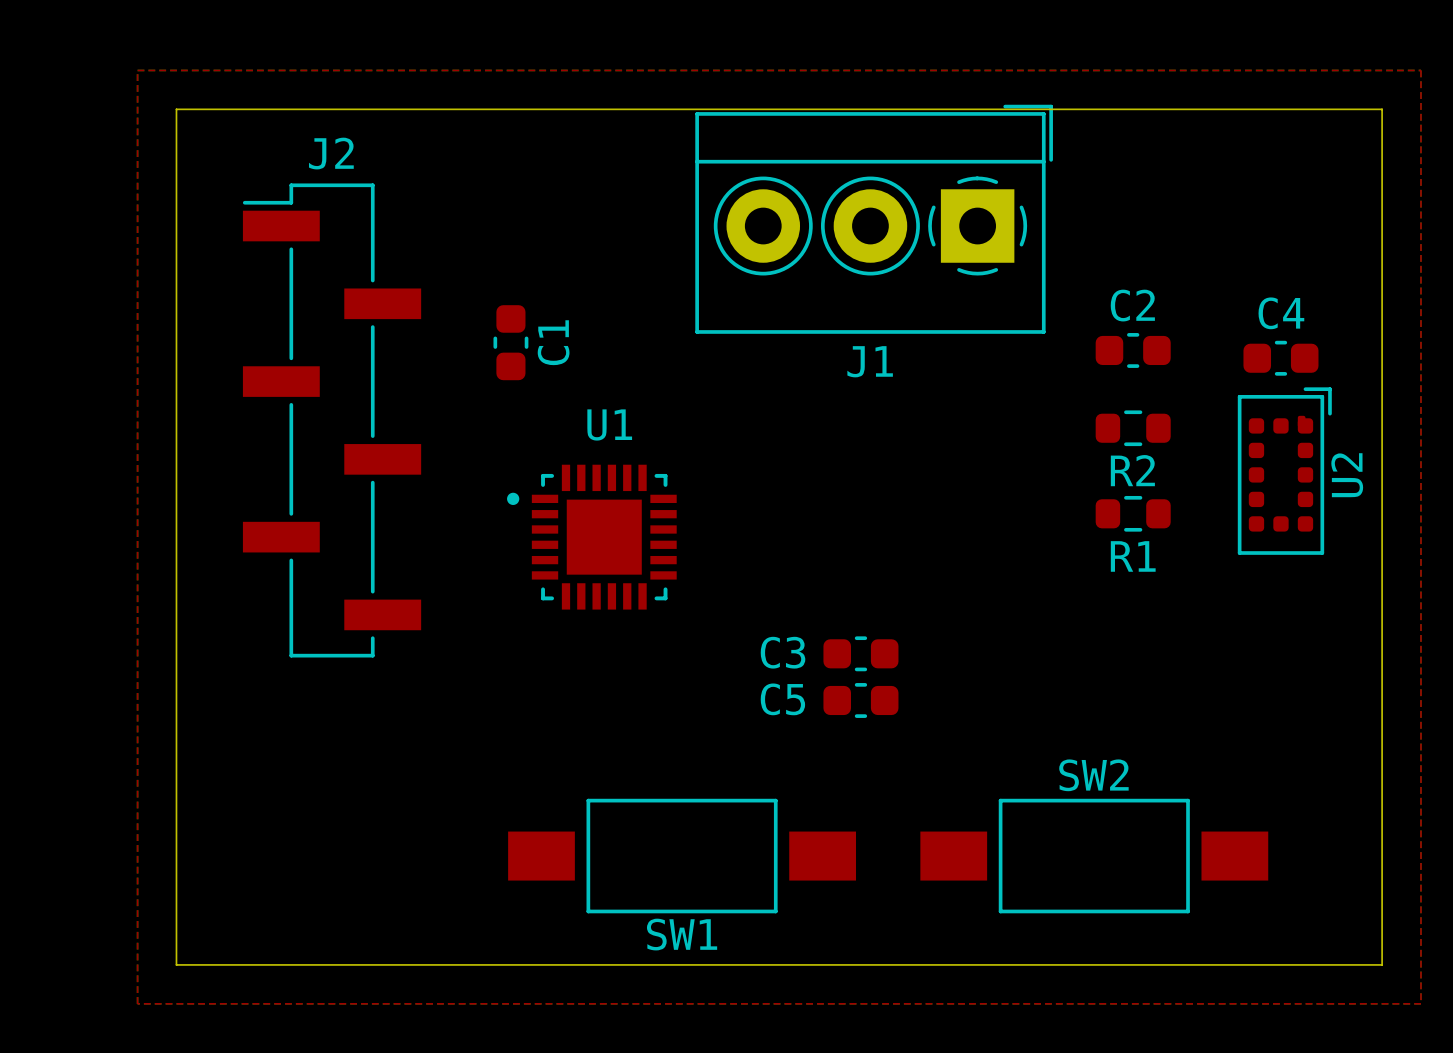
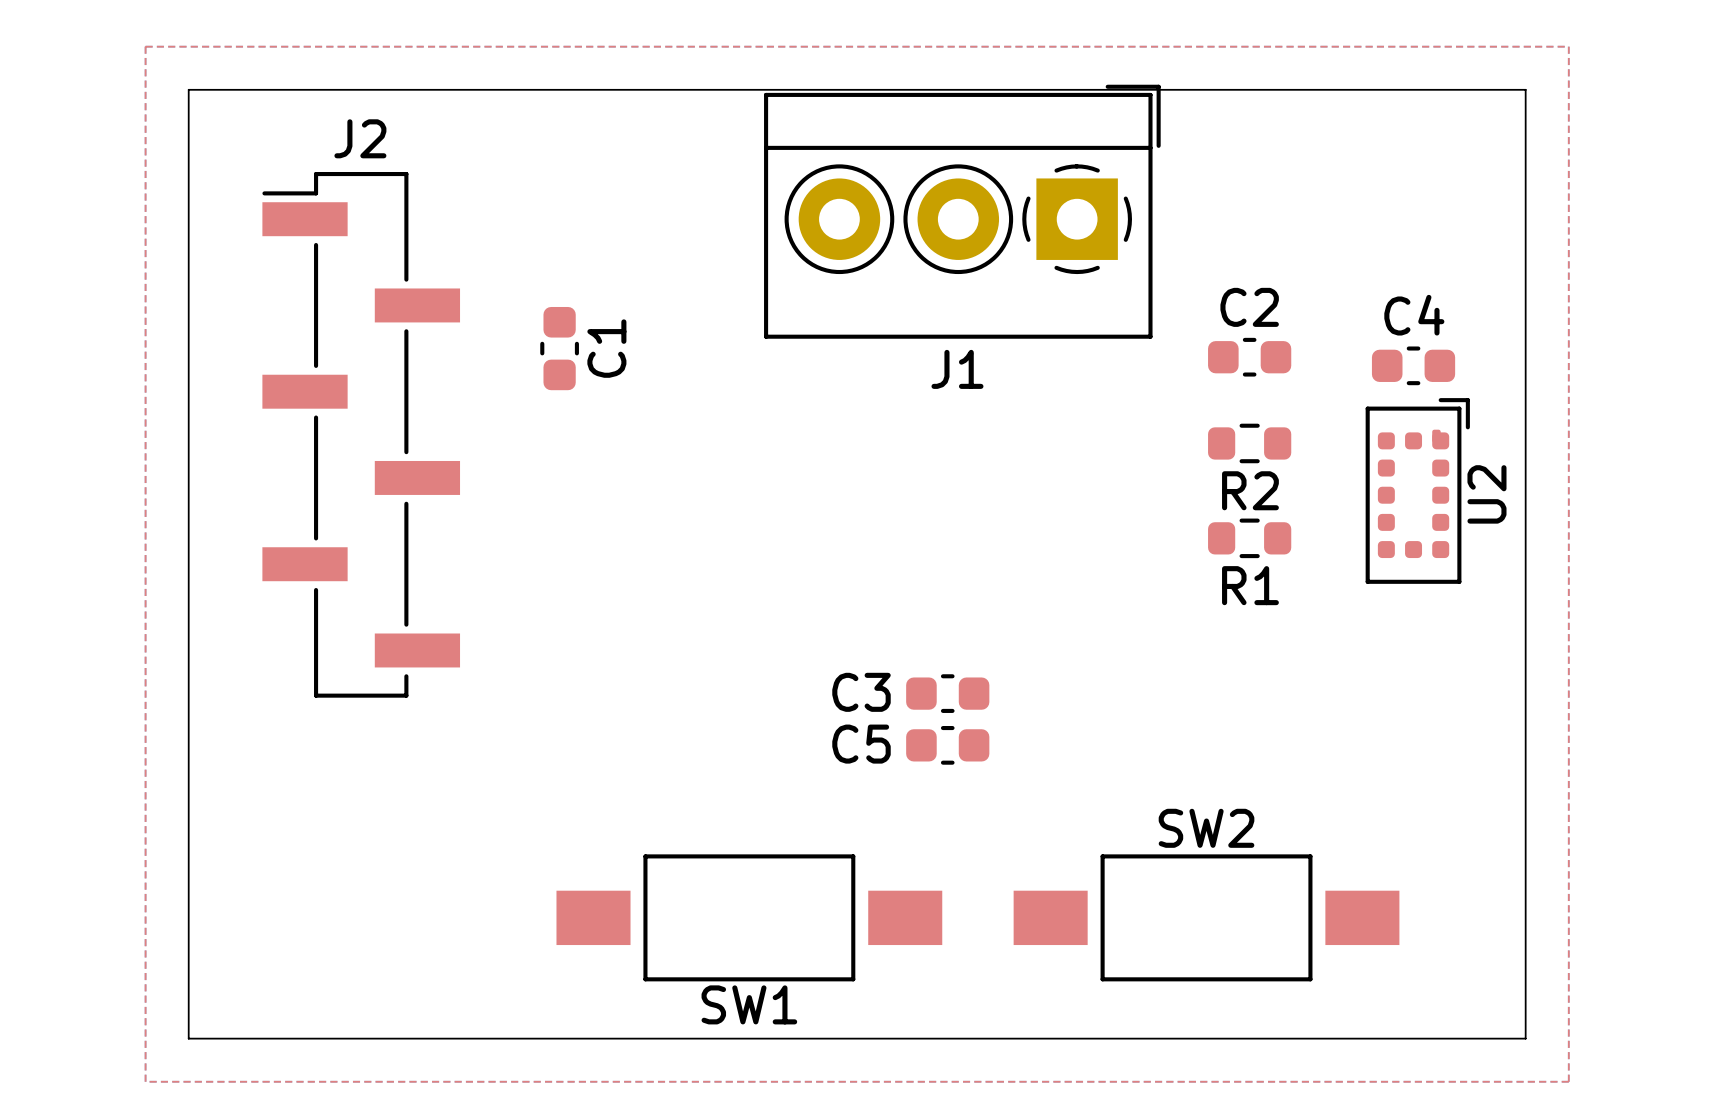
U1: (591, 537) -> none

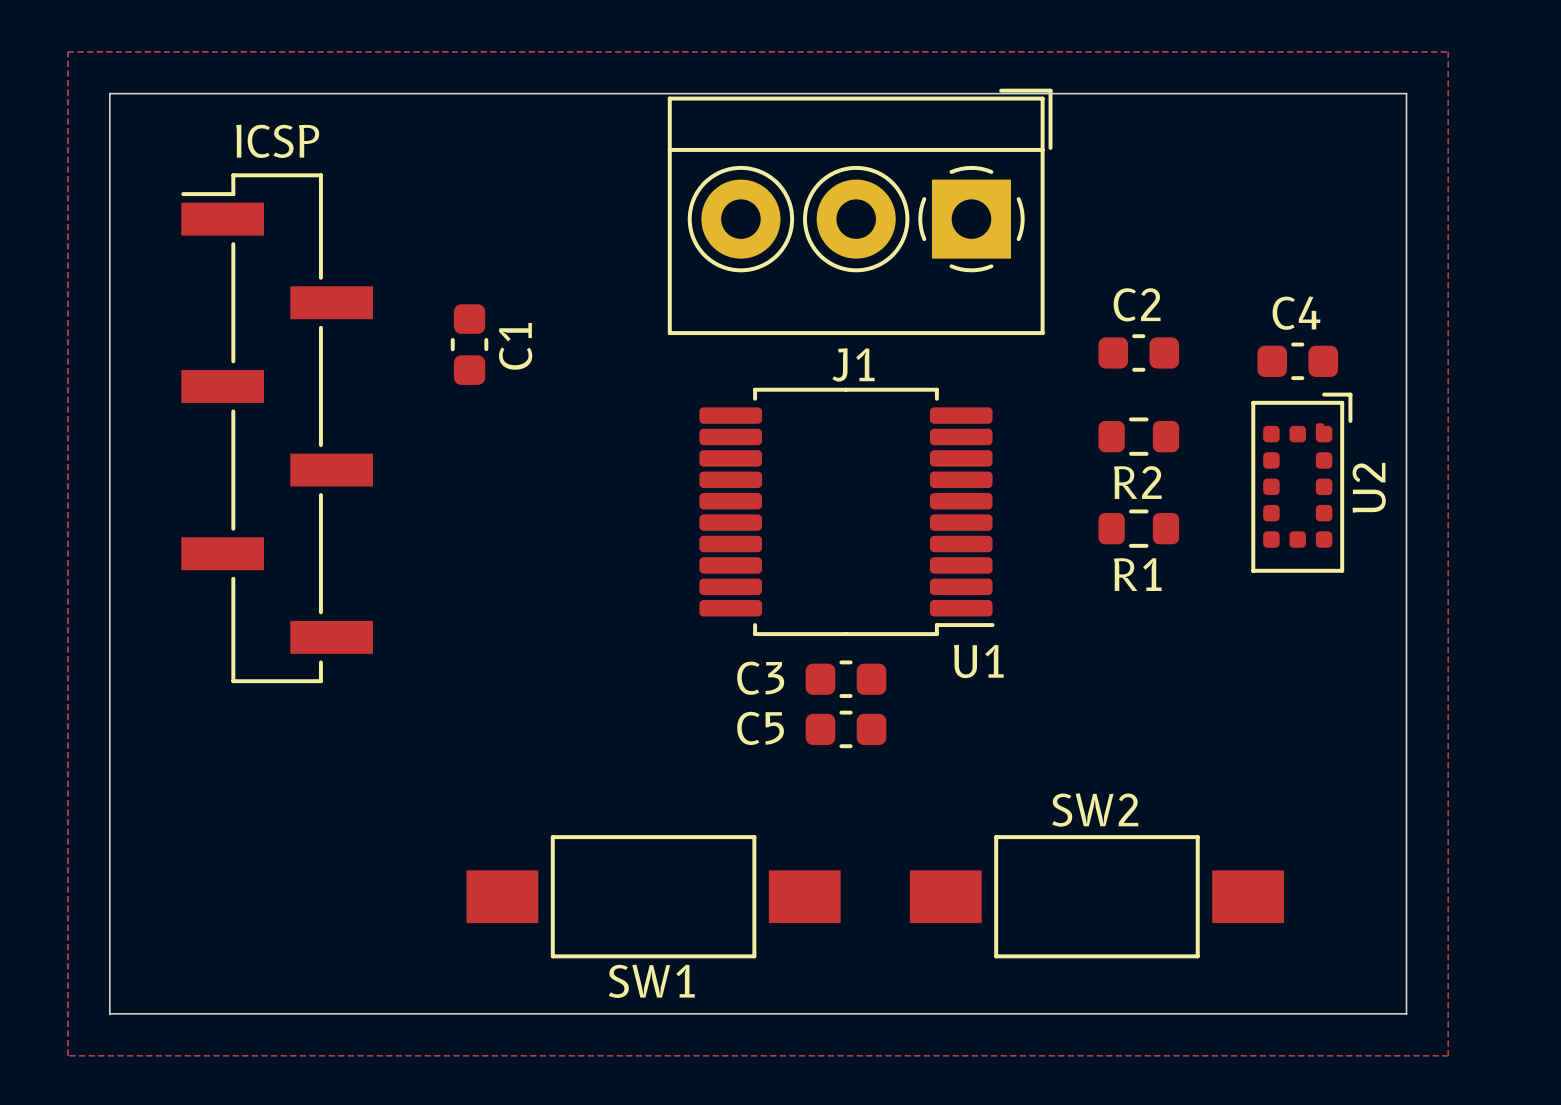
J2 name: J2 (360, 138) -> ICSP (277, 141)
U1: none -> (846, 511)

